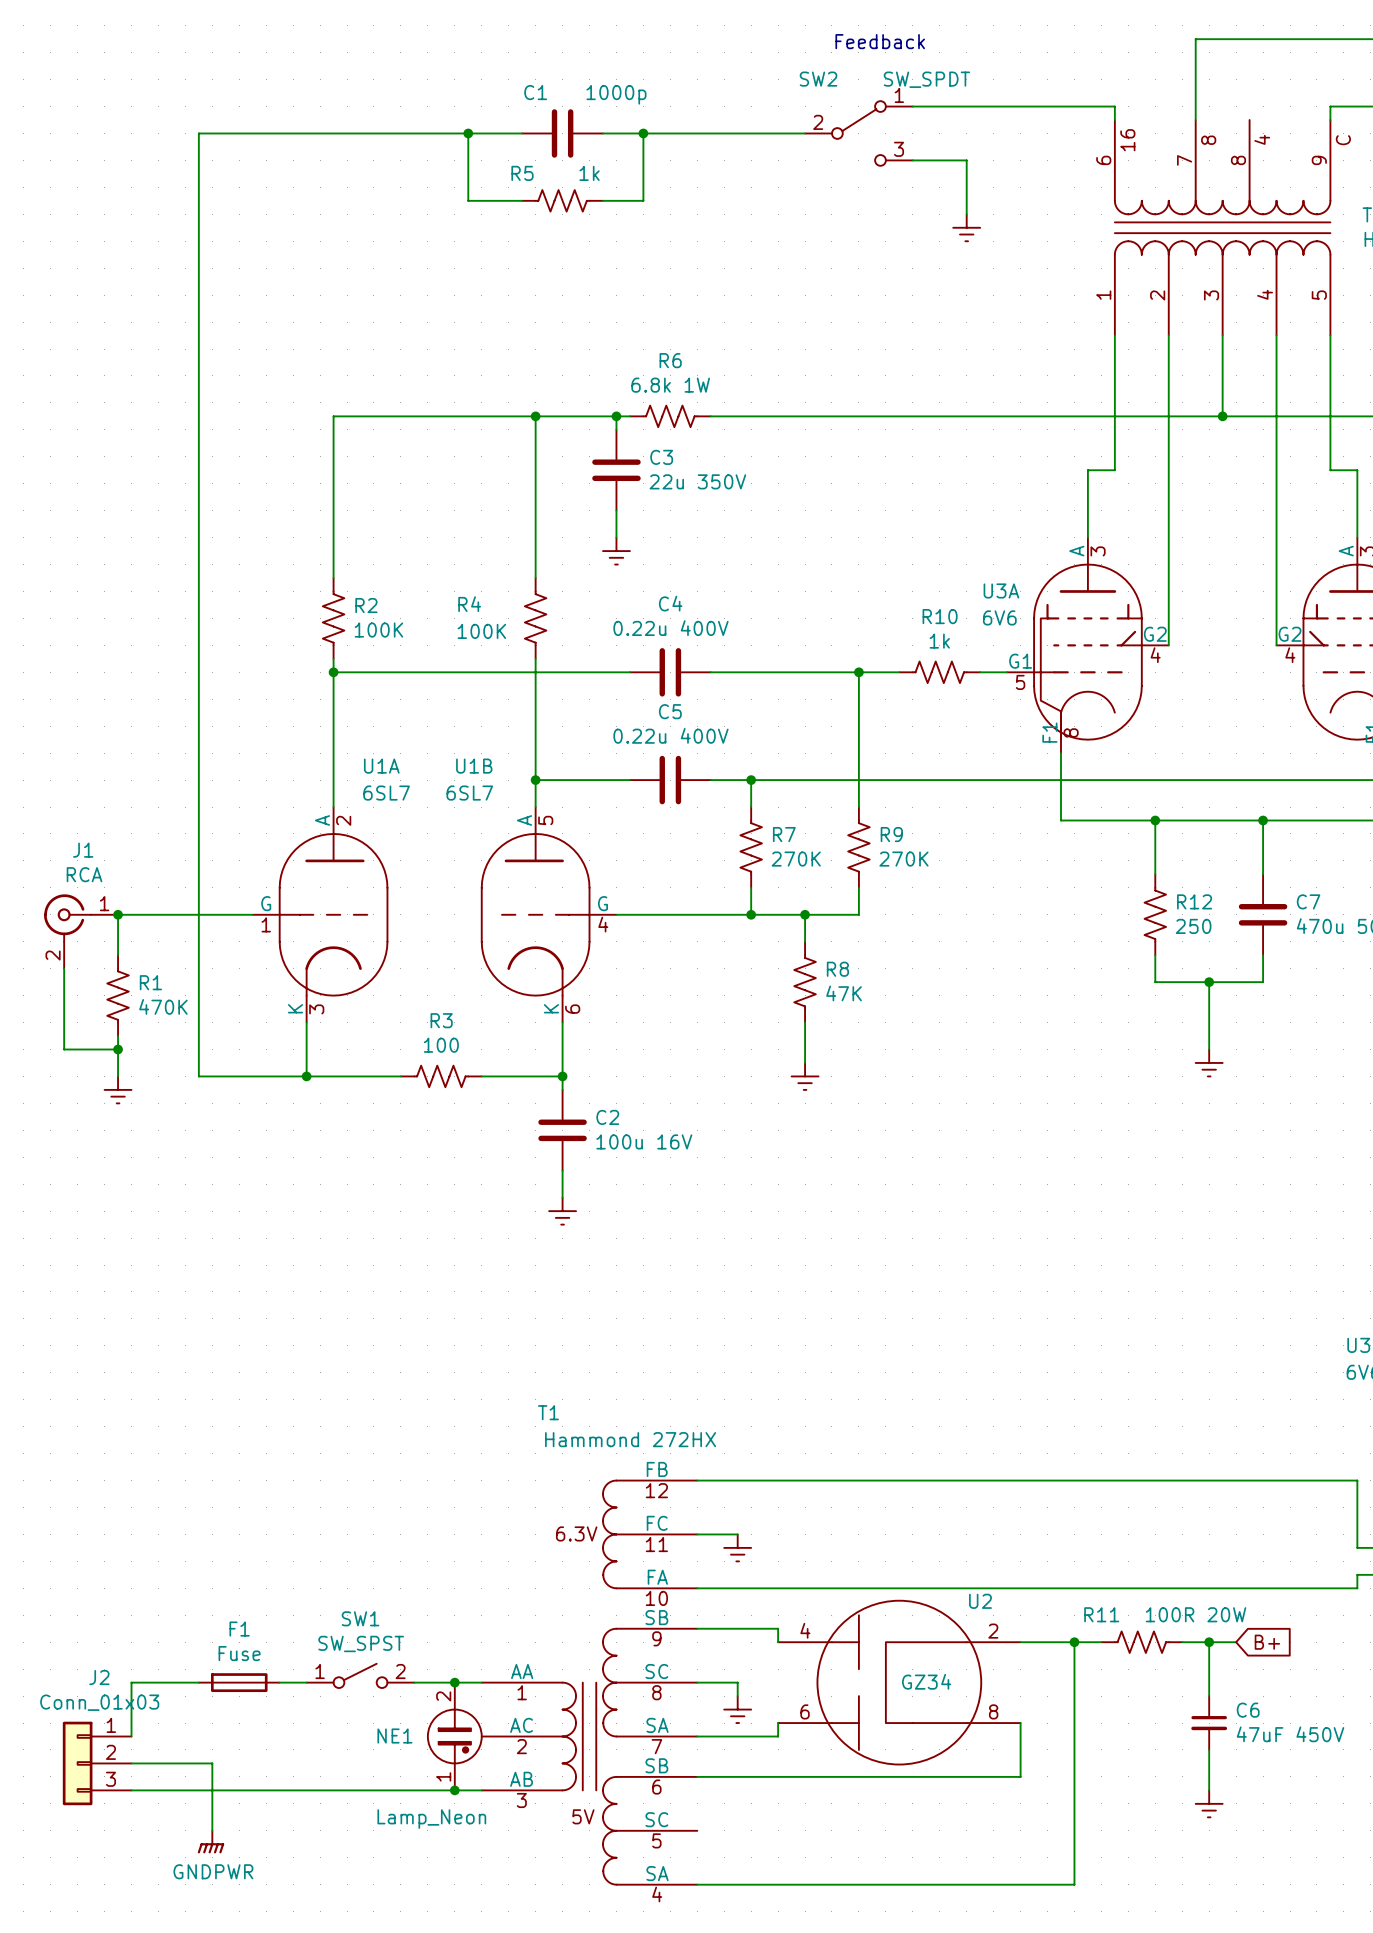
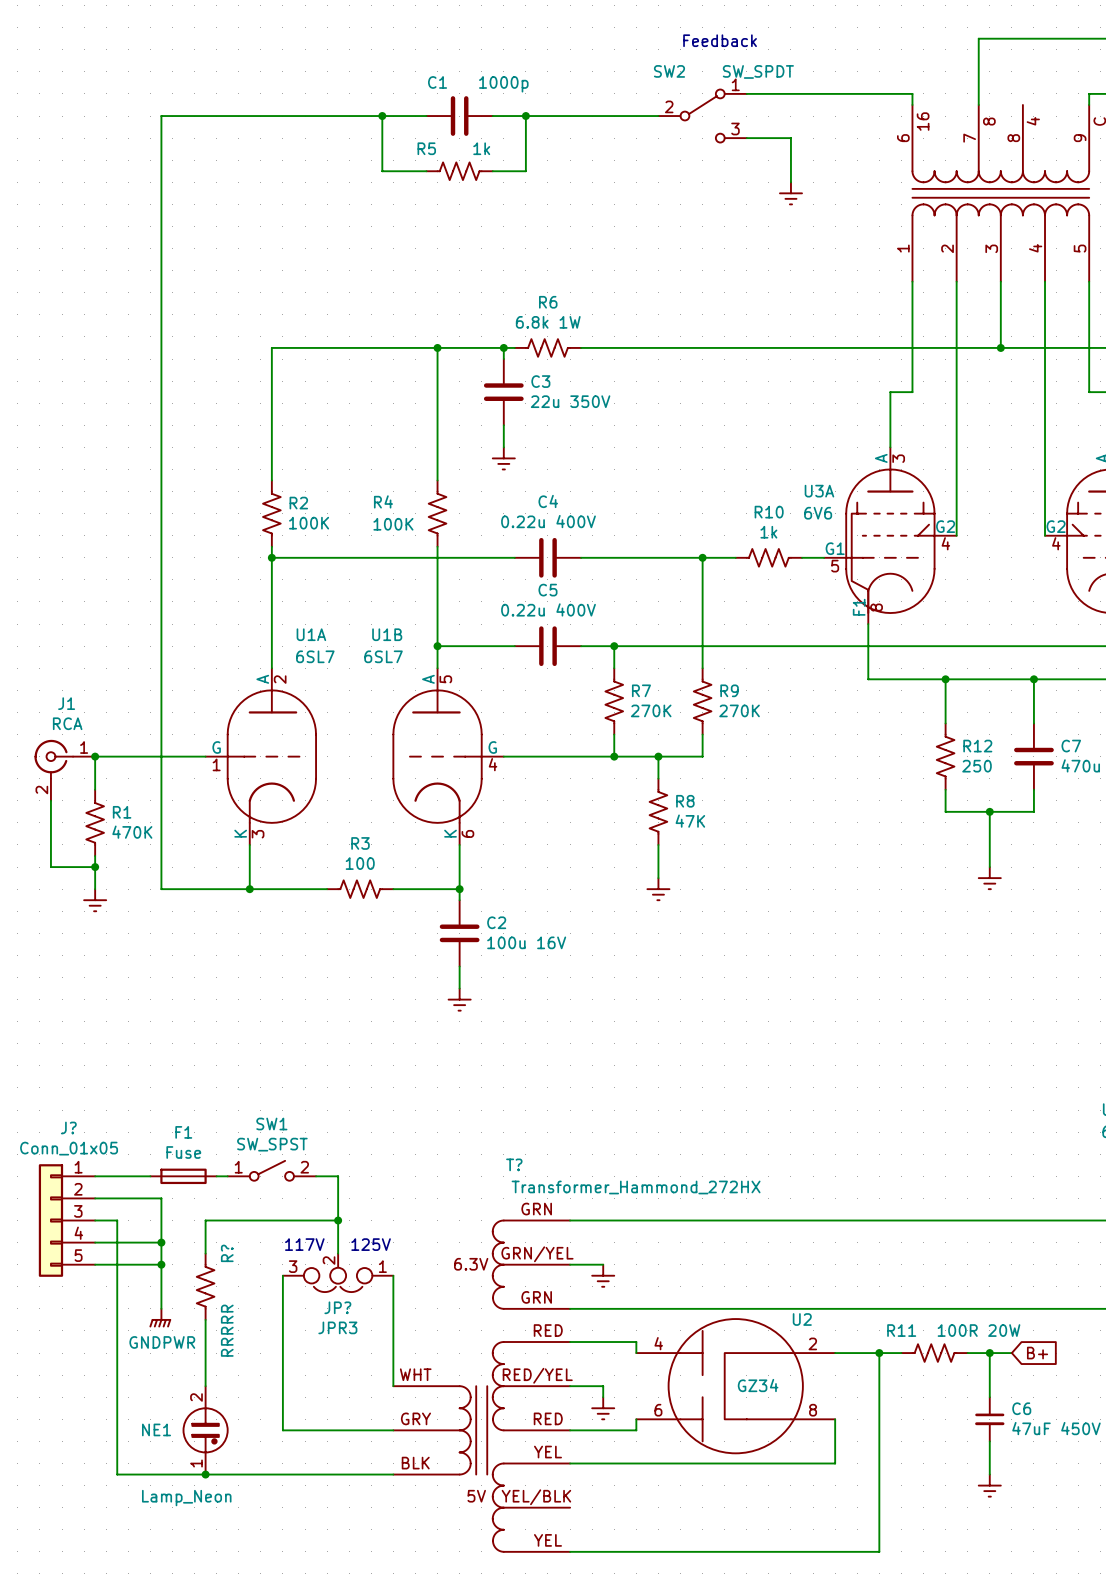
T1 name: T1 (548, 1412) -> T? (514, 1164)
wire: none -> (95, 1176) (150, 1176)
wire: none -> (216, 1176) (227, 1176)
wire: none -> (316, 1176) (338, 1176) (338, 1253)
T1 value: Hammond 272HX (630, 1439) -> Transformer_Hammond_272HX (636, 1187)
wire: none -> (95, 1198) (161, 1198) (161, 1308)
J?: none -> Conn_01x05 (66, 1220)
wire: none -> (338, 1220) (205, 1220) (205, 1253)
junction: none -> (338, 1220)
T1 symbol: [481, 1480, 698, 1885] -> [393, 1220, 571, 1552]
wire: none -> (95, 1242) (161, 1242)
junction: none -> (161, 1242)
text: none -> 117V (304, 1244)
text: none -> 125V (371, 1244)
wire: none -> (95, 1264) (161, 1264)
junction: none -> (161, 1264)
JP?: none -> JPR3 (338, 1272)
wire: none -> (282, 1275) (282, 1430) (393, 1430)
R?: none -> RRRRR (205, 1286)
wire: none -> (205, 1319) (205, 1386)
SW1 position: (360, 1675) -> (271, 1170)
wire: (198, 1682) (131, 1682) (131, 1736) -> none
F1 position: (239, 1682) -> (183, 1176)
wire: (279, 1682) (306, 1682) -> none
wire: (414, 1682) (481, 1682) -> (393, 1275) (393, 1386)
junction: (454, 1682) -> none
NE1 position: (454, 1736) -> (205, 1430)
J2: Conn_01x03 (97, 1763) -> none
wire: (131, 1763) (212, 1763) (212, 1830) -> none
wire: (131, 1790) (144, 1790) -> (95, 1220) (117, 1220) (117, 1474)
junction: none -> (205, 1474)
junction: (454, 1790) -> none
power symbol position: GNDPWR (210, 1842) -> GNDPWR (160, 1318)

